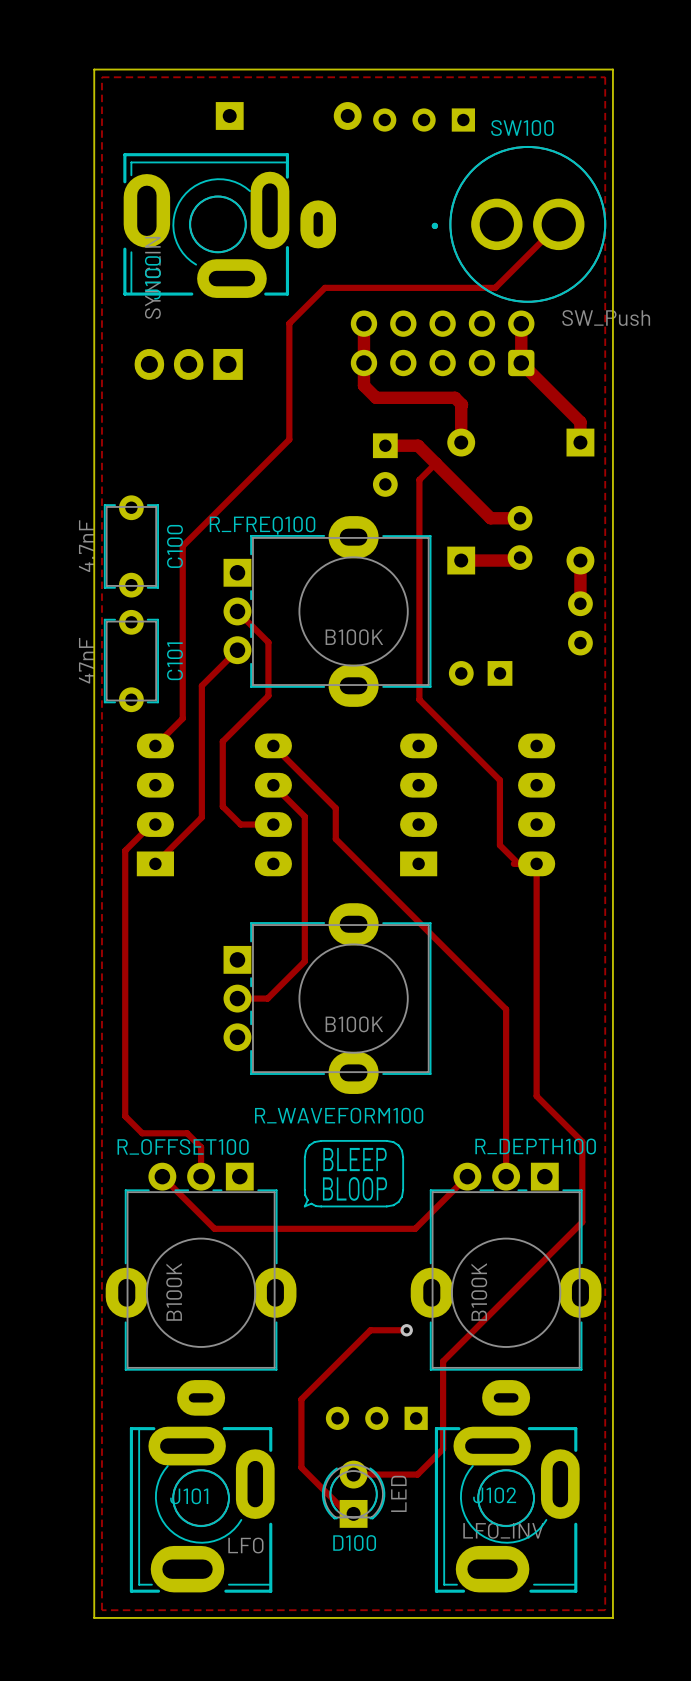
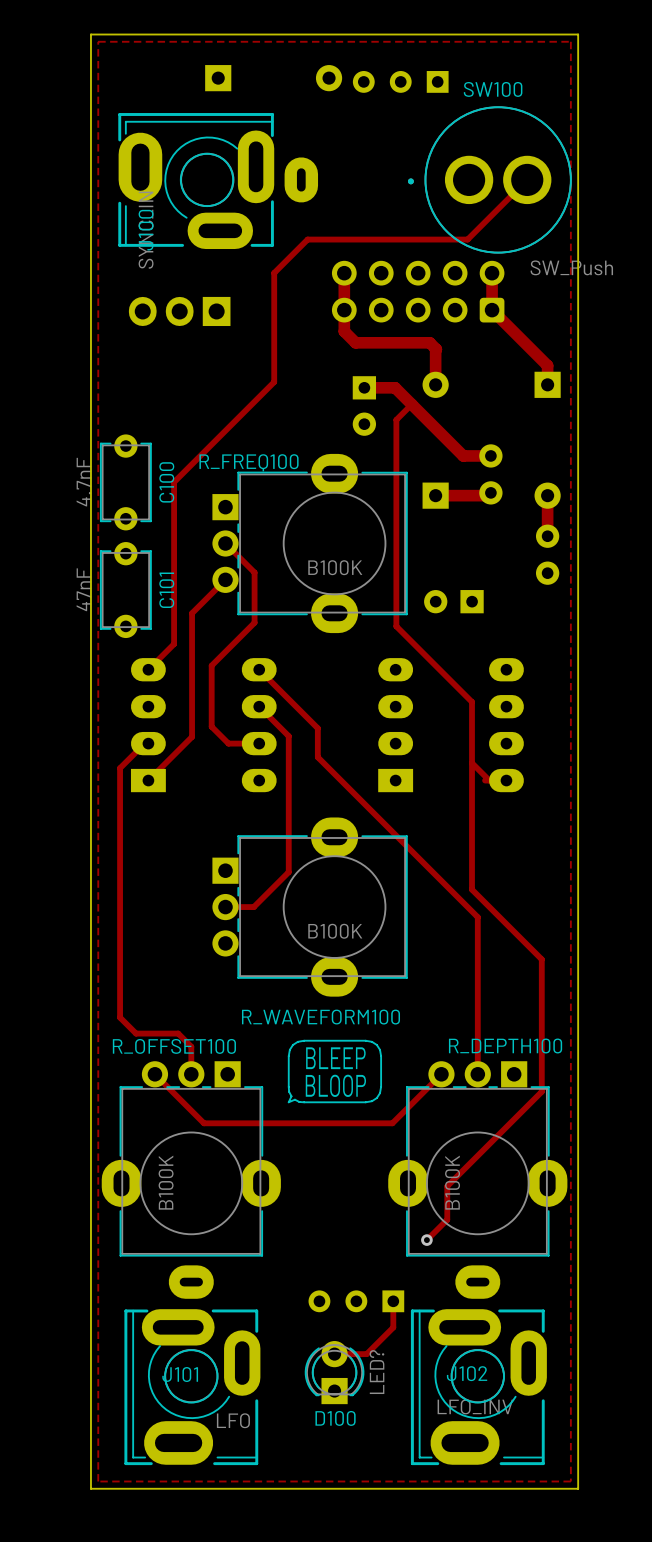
track: none -> (471, 763) (471, 889) (541, 959) (541, 1091) (447, 1186) (447, 1219) (426, 1240)
track: (536, 863) (536, 1096) (582, 1141) (582, 1222) (443, 1361) (443, 1449) (417, 1474) (387, 1474) -> (393, 1301) (393, 1327) (366, 1354)
track: (406, 1330) (370, 1330) (301, 1399) (301, 1467) (347, 1513) (353, 1513) -> none
via position: (406, 1330) -> (426, 1240)
D100 value: LED (398, 1493) -> LED? (376, 1372)

